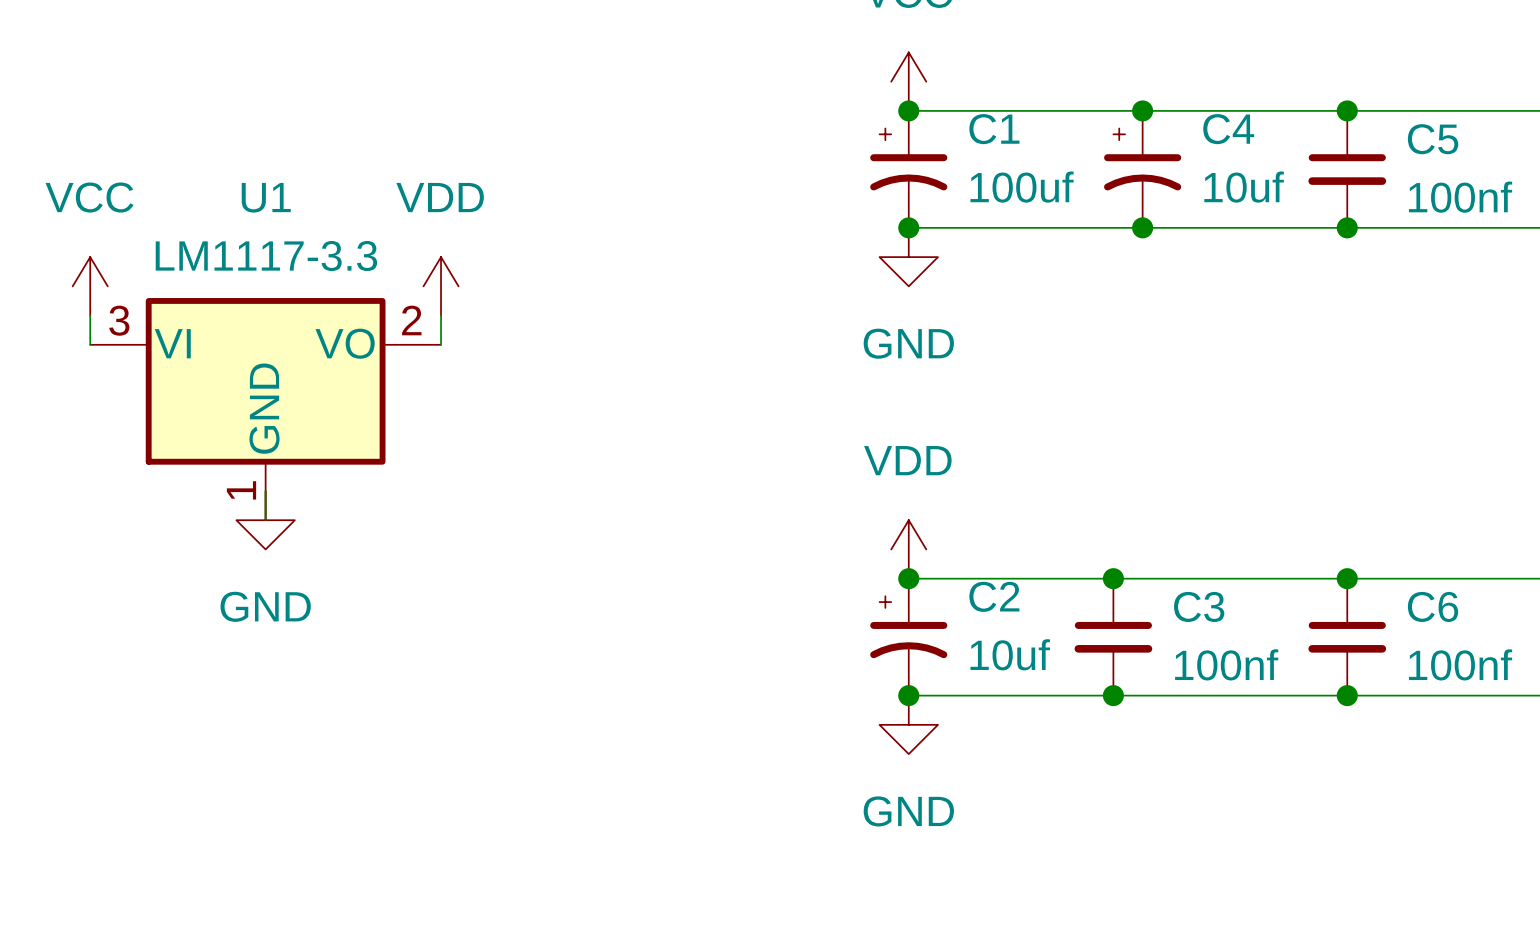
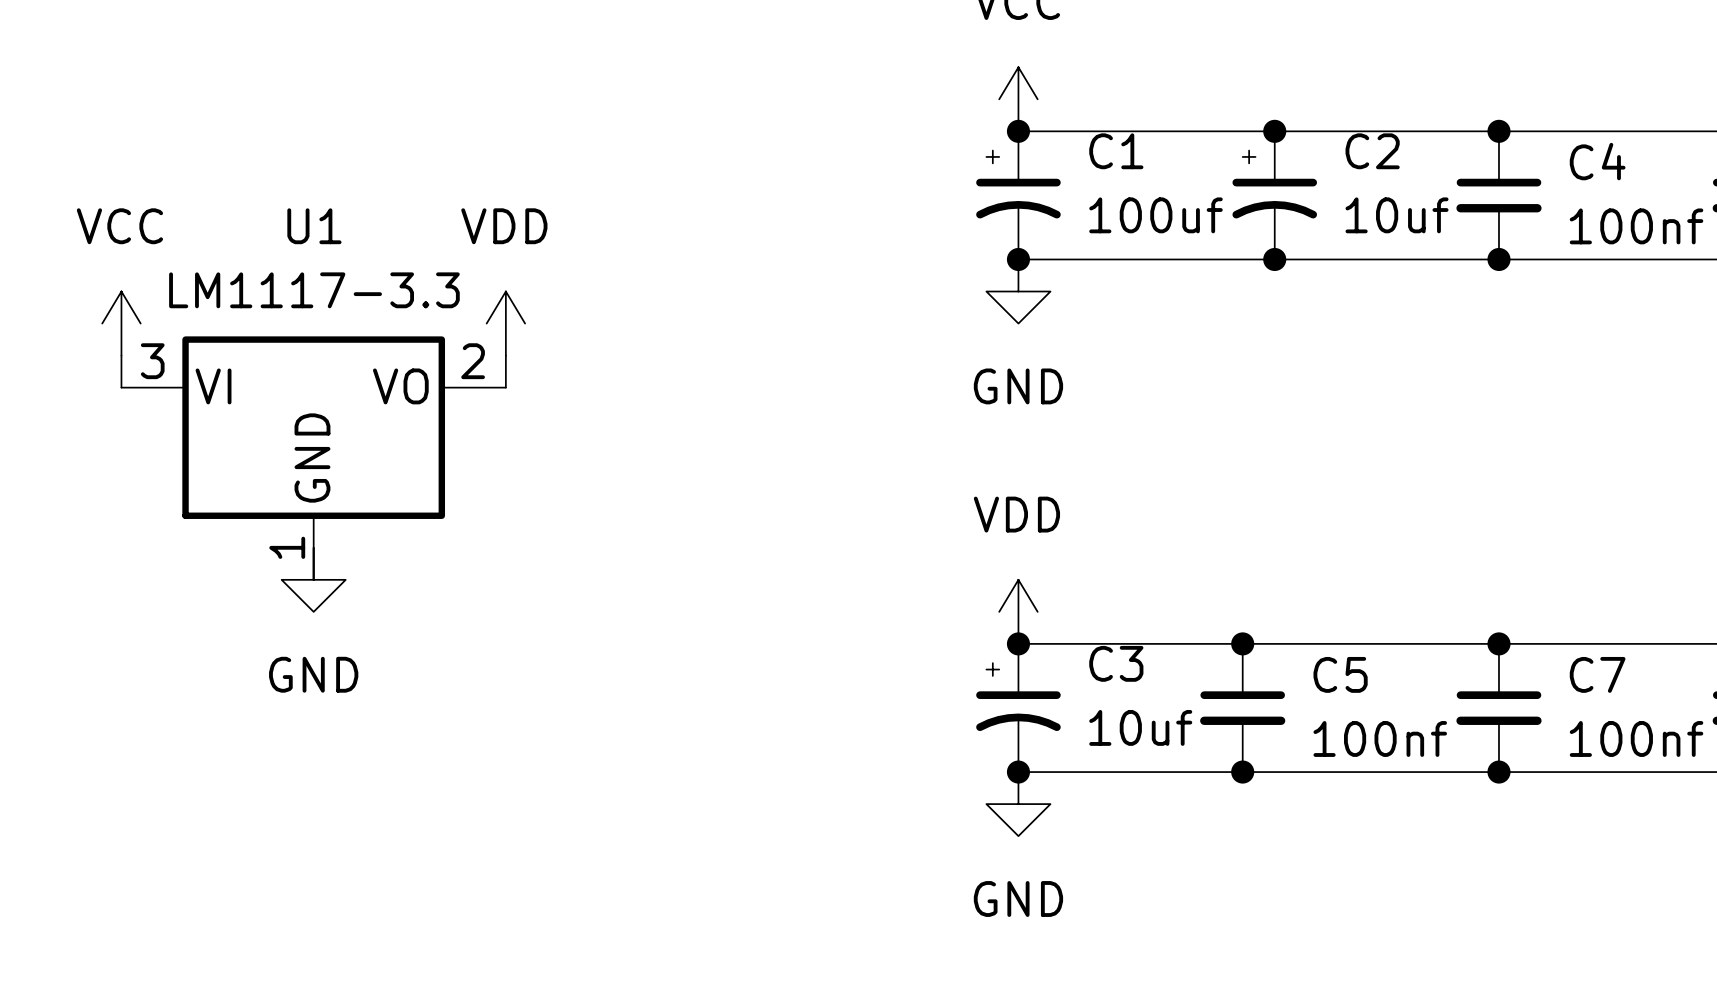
C4 name: C4 (1228, 129) -> C2 (1372, 151)
C5 name: C5 (1433, 139) -> C4 (1597, 161)
C2 name: C2 (994, 596) -> C3 (1116, 663)
C3 name: C3 (1199, 606) -> C5 (1340, 674)
C6 name: C6 (1433, 606) -> C7 (1597, 674)

